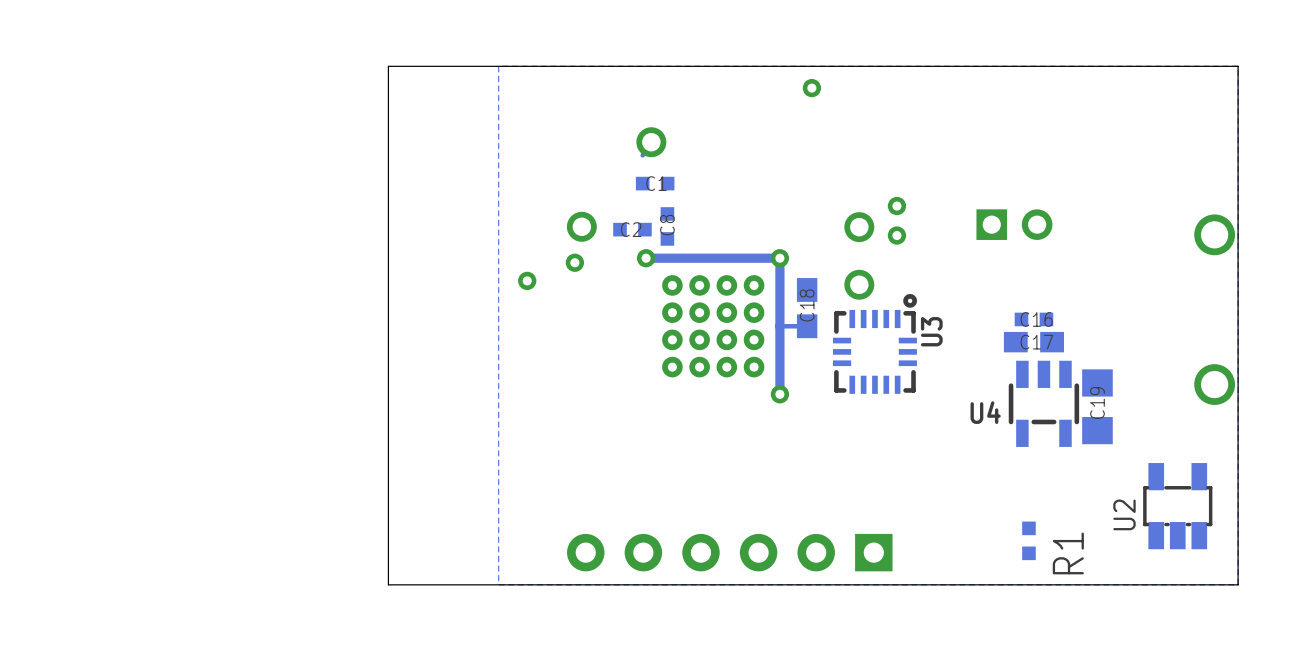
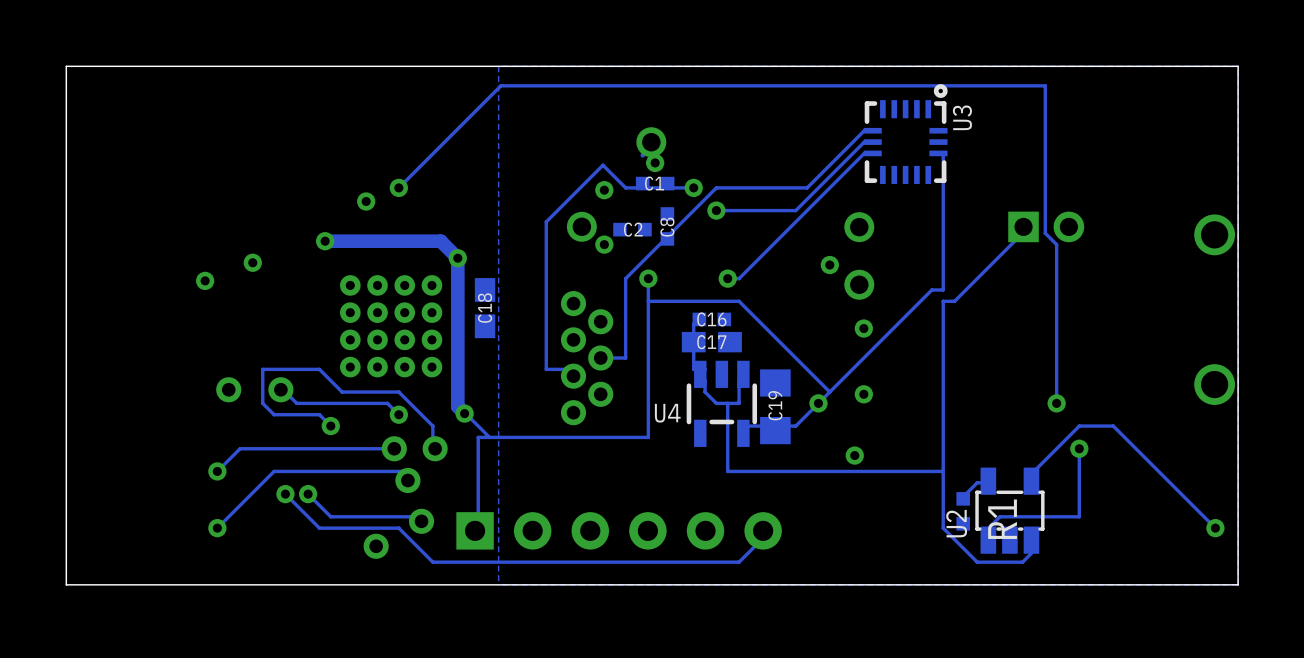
board edge: (388, 66) (388, 584) -> (388, 66) (66, 66) (66, 584) (388, 584)
via: (811, 88) -> none
track: none -> (872, 130) (863, 131) (807, 187) (716, 187) (625, 278) (625, 358) (600, 358)
track: none -> (872, 142) (863, 142) (795, 210) (716, 210)
track: none -> (872, 153) (863, 153) (739, 278) (727, 278)
track: none -> (938, 153) (943, 153) (943, 289) (931, 289) (795, 426) (784, 426) (775, 430) (773, 426) (739, 426) (743, 433)
via: none -> (655, 162)
track: none -> (398, 187) (500, 85) (1045, 85) (1045, 233) (1056, 244) (1056, 403)
via: none -> (398, 187)
track: none -> (693, 187) (625, 187) (602, 165) (546, 221) (546, 369) (568, 369) (573, 376)
via: none -> (693, 187)
via: none -> (604, 190)
via: none -> (366, 201)
via: (896, 206) -> none
via: none -> (716, 210)
part position: (1014, 224) -> (1046, 226)
track: none -> (1023, 226) (1022, 233) (954, 301) (943, 301) (943, 528) (977, 562) (1022, 562) (1033, 550) (1031, 540)
via: (896, 235) -> none
track: none -> (325, 241) (440, 241) (457, 258) (457, 406) (489, 437)
via: none -> (325, 241)
via: none -> (604, 244)
via: none -> (457, 258)
track: (646, 258) (779, 258) (779, 394) -> none
via position: (646, 258) -> (648, 278)
via: (779, 258) -> none
via: none -> (252, 262)
via: (574, 262) -> none
via: none -> (829, 265)
track: none -> (648, 278) (648, 437) (478, 437) (478, 528) (475, 530)
via: none -> (727, 278)
via: none -> (205, 280)
via: (527, 280) -> none
track: none -> (648, 301) (739, 301) (829, 392)
part: none -> (573, 303)
C18 position: (807, 308) -> (485, 308)
track: none -> (699, 319) (693, 323) (693, 369) (705, 369) (700, 374) (705, 380) (705, 392) (716, 403) (739, 403) (739, 380) (743, 374)
C16 position: (1033, 319) -> (711, 319)
part: none -> (600, 321)
part position: (713, 326) -> (391, 326)
track: (807, 326) (779, 326) -> none
via: none -> (863, 328)
part: none -> (573, 339)
C17 position: (1033, 342) -> (711, 342)
U3 position: (874, 343) -> (905, 134)
part: none -> (600, 358)
part: none -> (573, 376)
part: none -> (228, 389)
track: none -> (280, 389) (296, 403) (387, 403) (398, 414)
part: none -> (280, 389)
part: none -> (600, 394)
via position: (779, 394) -> (818, 403)
via: none -> (863, 394)
track: none -> (727, 403) (727, 471) (943, 471)
U4 position: (1043, 403) -> (721, 403)
via: none -> (1056, 403)
C19 position: (1097, 406) -> (775, 406)
part: none -> (573, 412)
via: none -> (464, 413)
via: none -> (398, 414)
track: none -> (330, 426) (319, 414) (274, 414) (262, 403) (262, 369) (319, 369) (342, 392) (398, 392) (432, 426) (432, 448) (435, 448)
via: none -> (330, 426)
track: none -> (394, 448) (240, 448) (217, 471)
part: none -> (394, 448)
part: none -> (435, 448)
track: none -> (1079, 448) (1079, 516) (999, 516) (988, 528) (988, 540)
via: none -> (1079, 448)
via: none -> (854, 455)
via: none -> (217, 471)
track: none -> (407, 480) (410, 471) (274, 471) (217, 528)
part: none -> (407, 480)
track: none -> (988, 481) (988, 482) (977, 482) (963, 498)
track: none -> (1031, 481) (1033, 471) (1079, 426) (1113, 426) (1215, 528)
track: none -> (285, 494) (319, 528) (398, 528) (432, 562) (739, 562) (761, 539) (763, 530)
via: none -> (285, 494)
track: none -> (308, 494) (330, 516) (421, 516) (421, 521)
via: none -> (308, 494)
U2 position: (1177, 506) -> (1009, 510)
part: none -> (421, 521)
via: none -> (217, 528)
via: none -> (1215, 528)
R1 position: (1028, 540) -> (963, 511)
part: none -> (376, 546)
part rotation: 0° (729, 552) -> 180° (619, 530)

